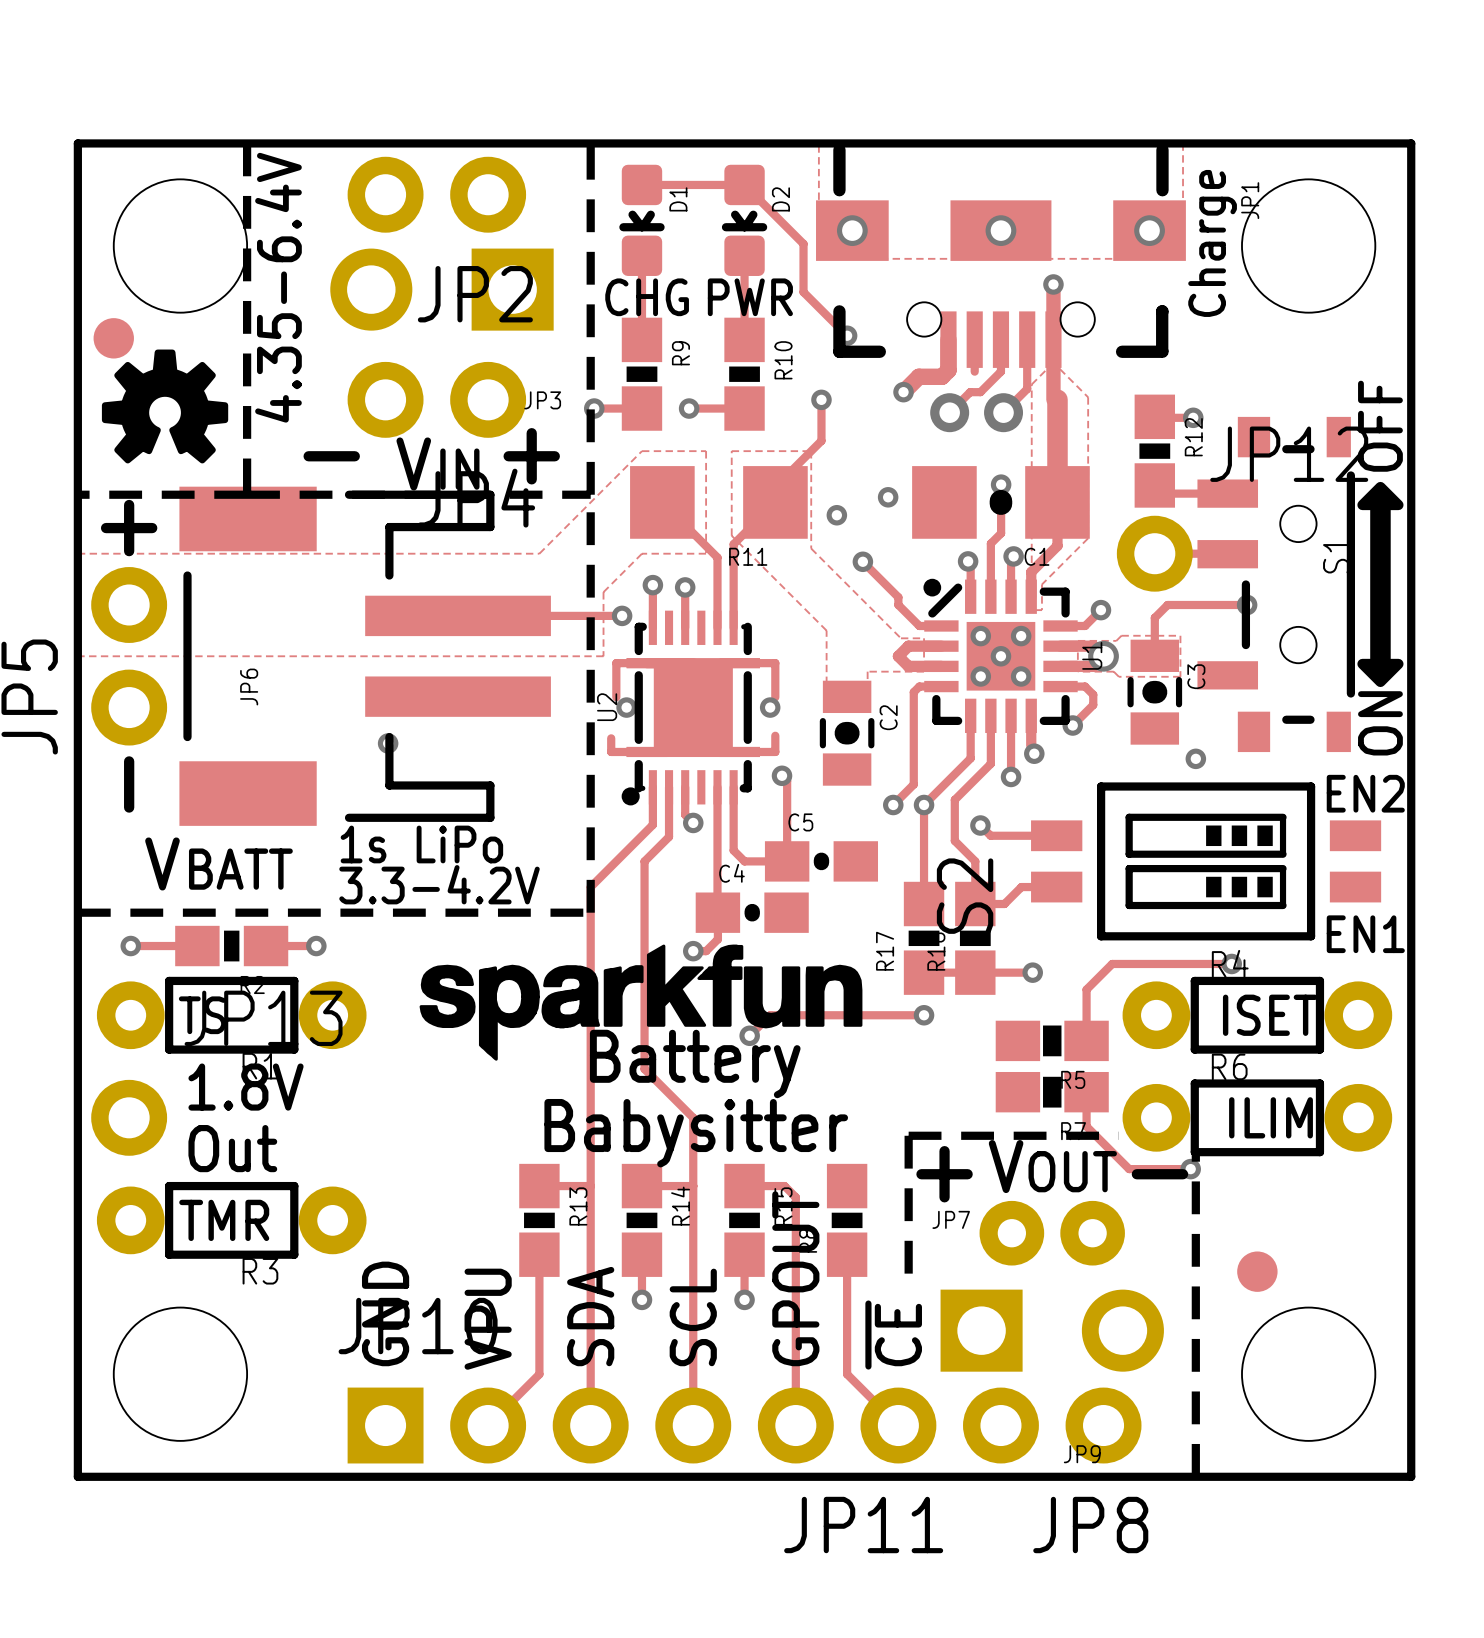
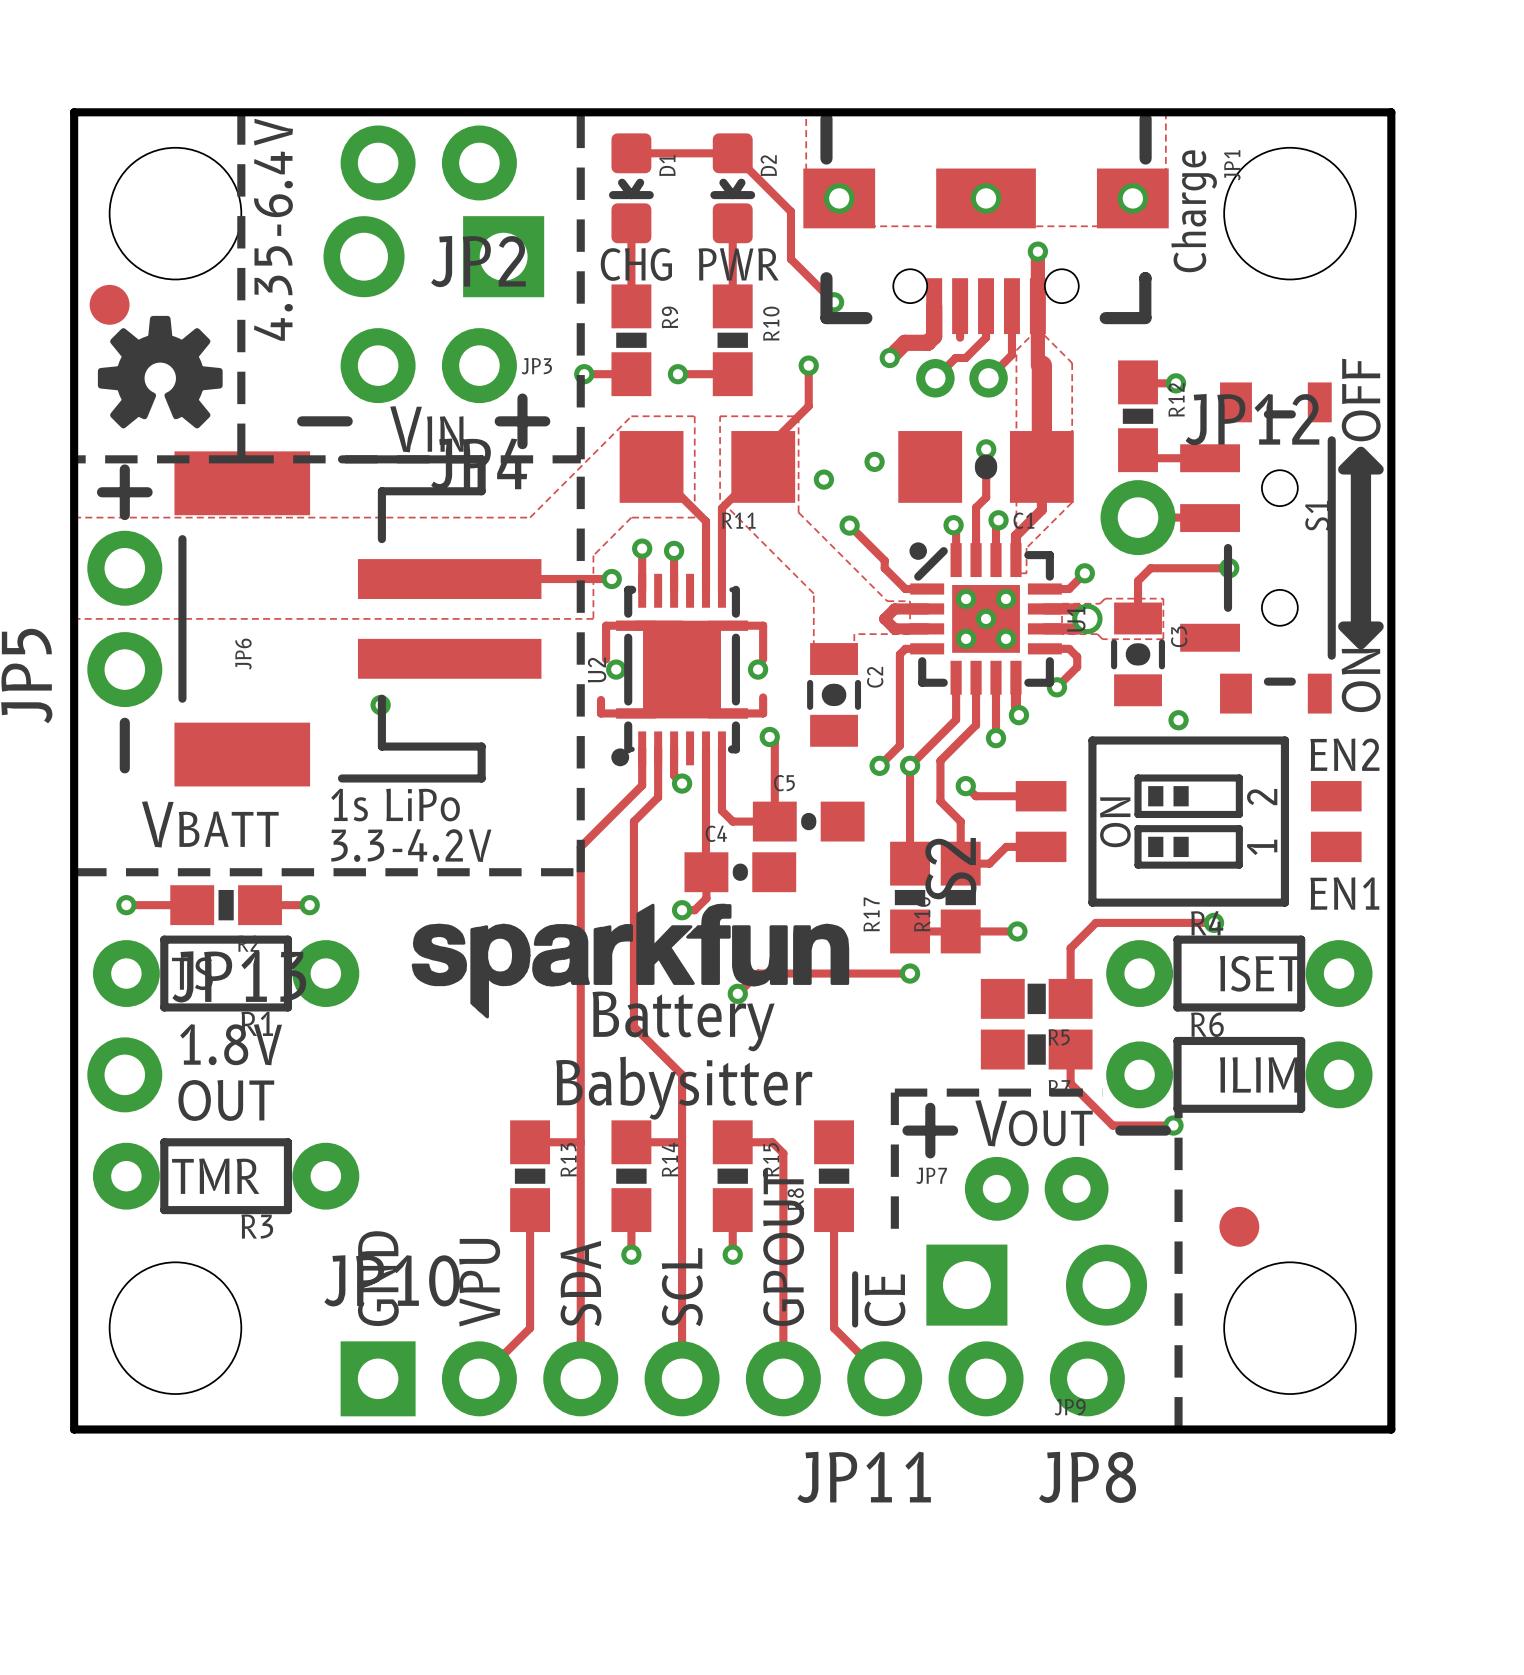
S2 footprint: [1031, 782, 1382, 941] -> [1015, 736, 1362, 907]
text: Out (232, 1148) -> OUT (226, 1100)

